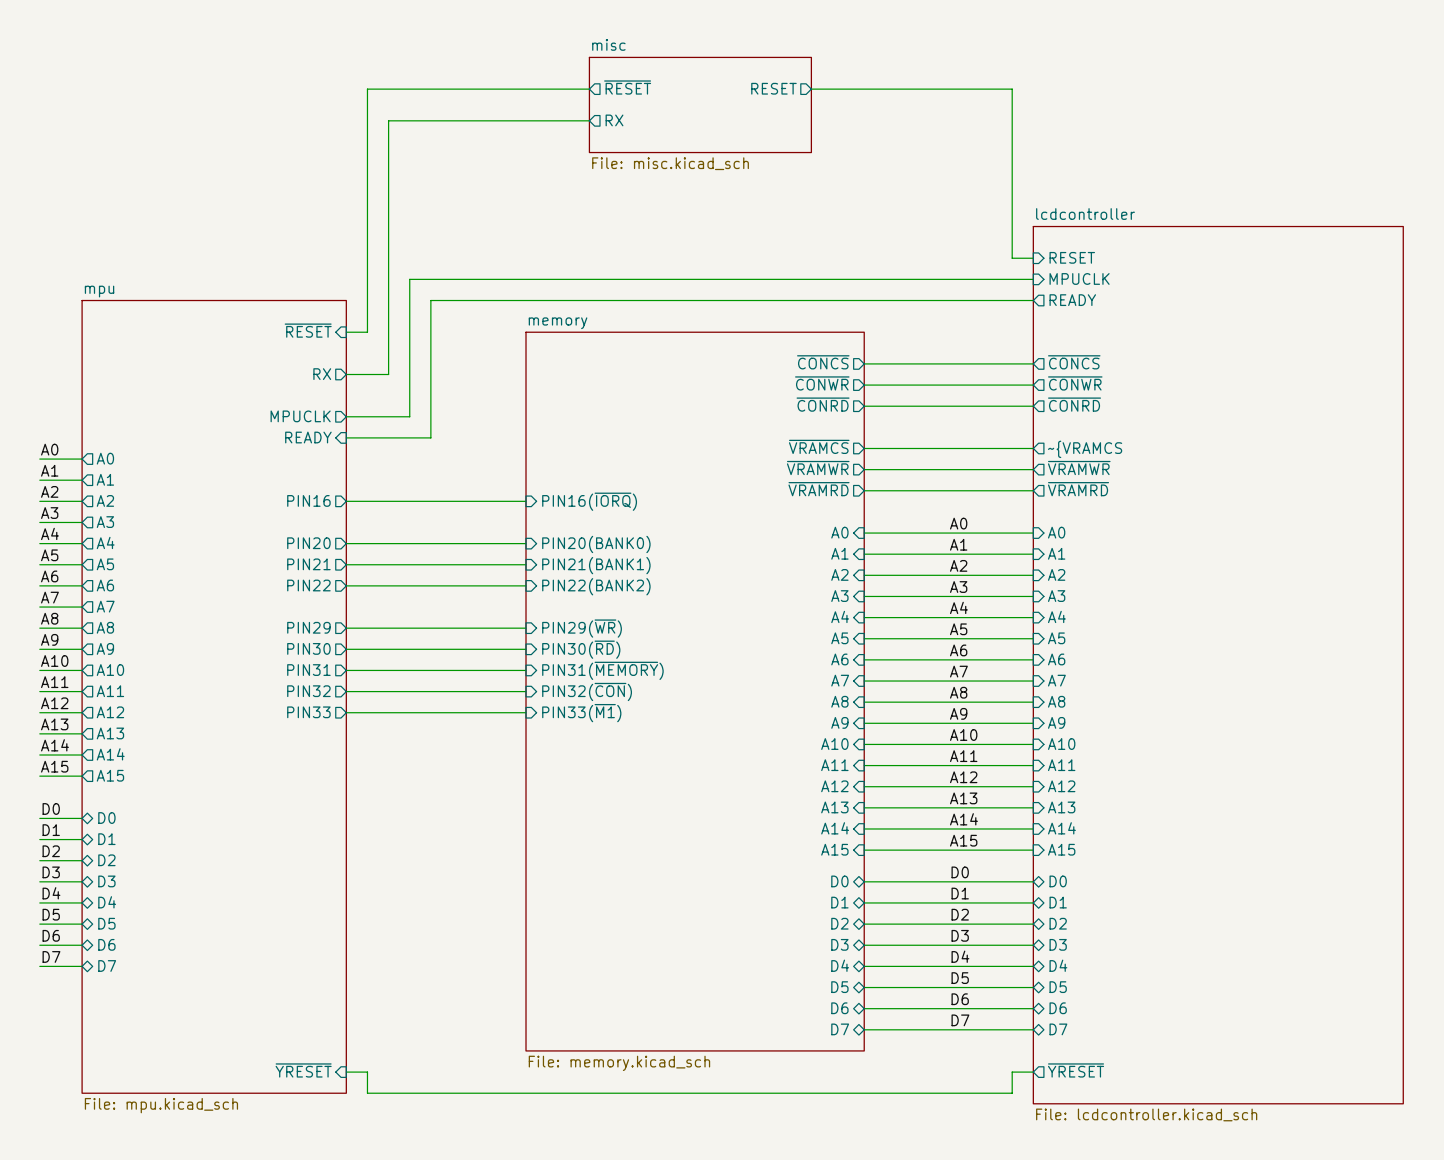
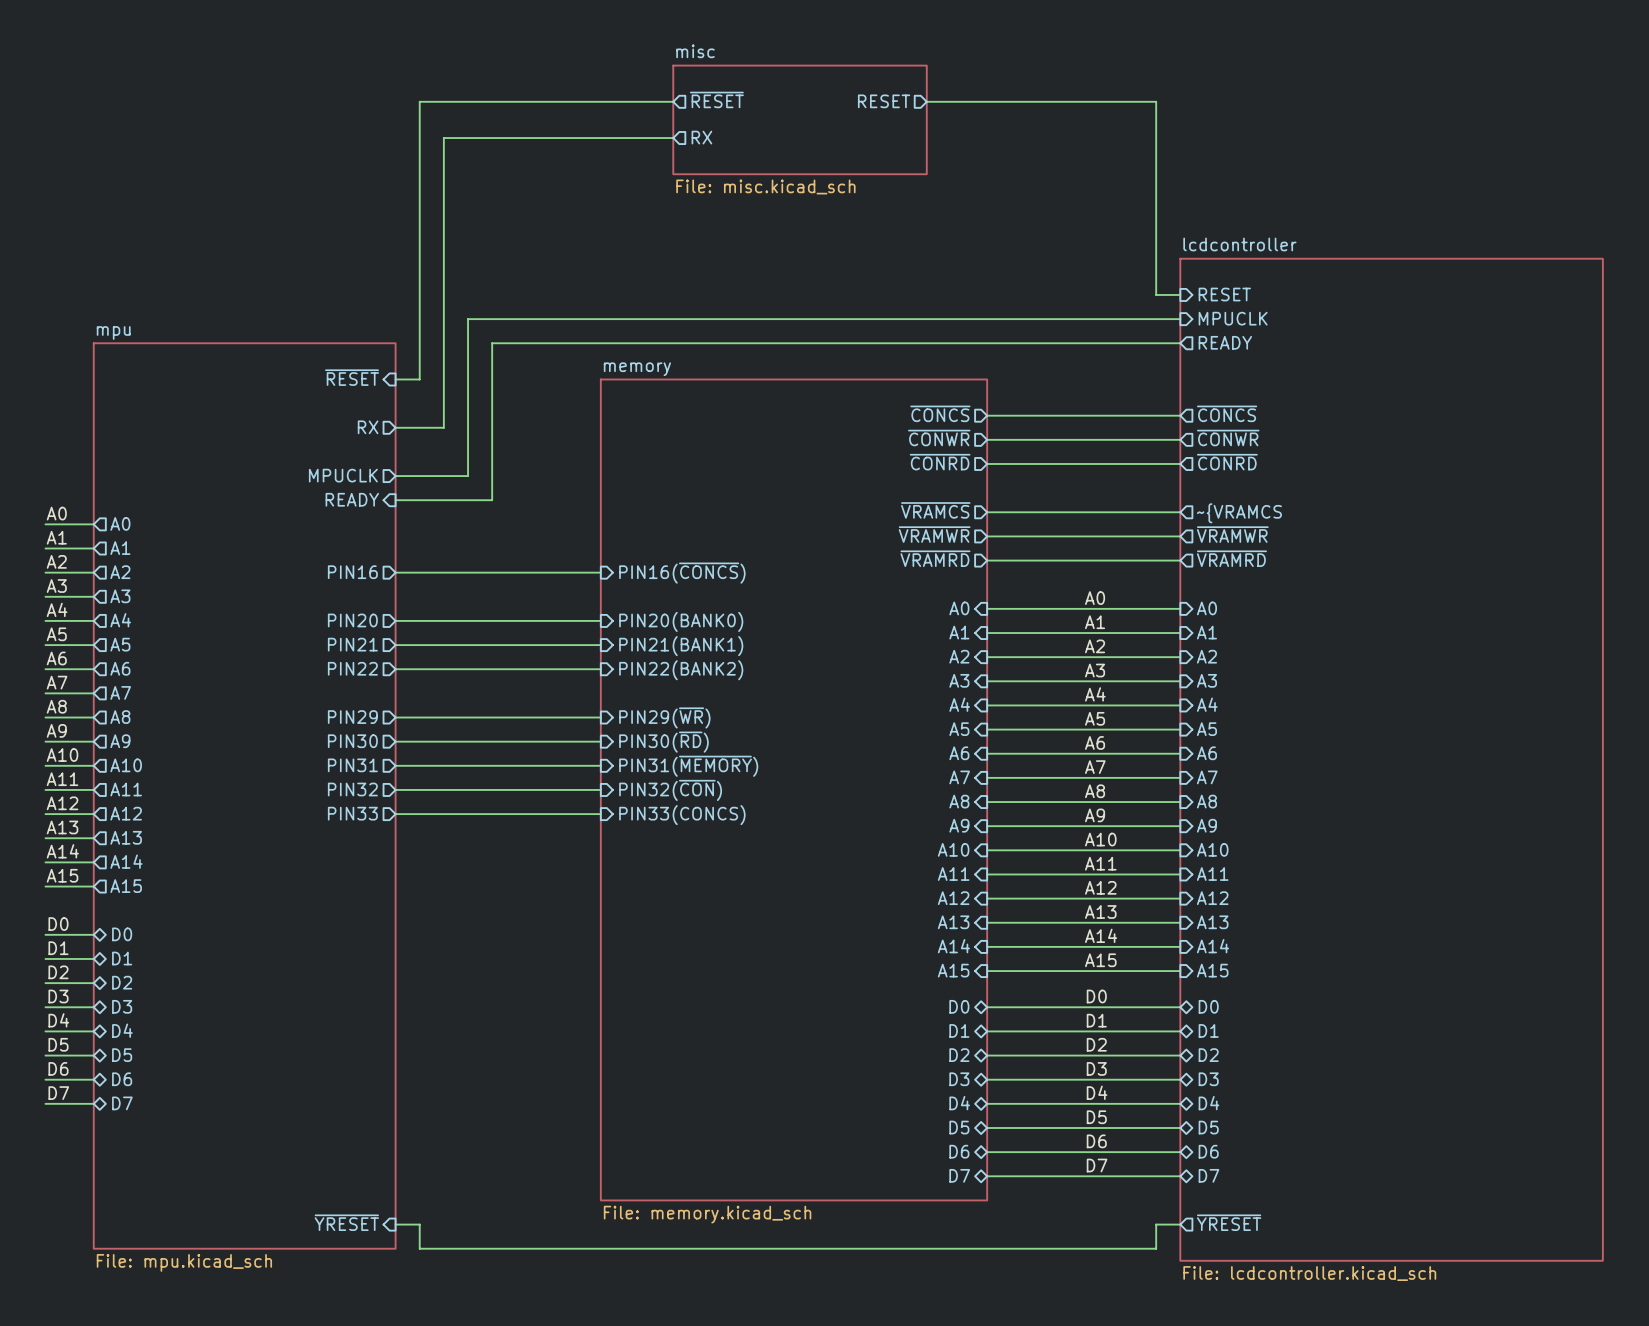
sheet pin: PIN16(~{IORQ}) (589, 501) -> PIN16(~{CONCS}) (682, 573)
sheet pin: PIN33(~{M1}) (581, 713) -> PIN33(CONCS) (682, 815)

